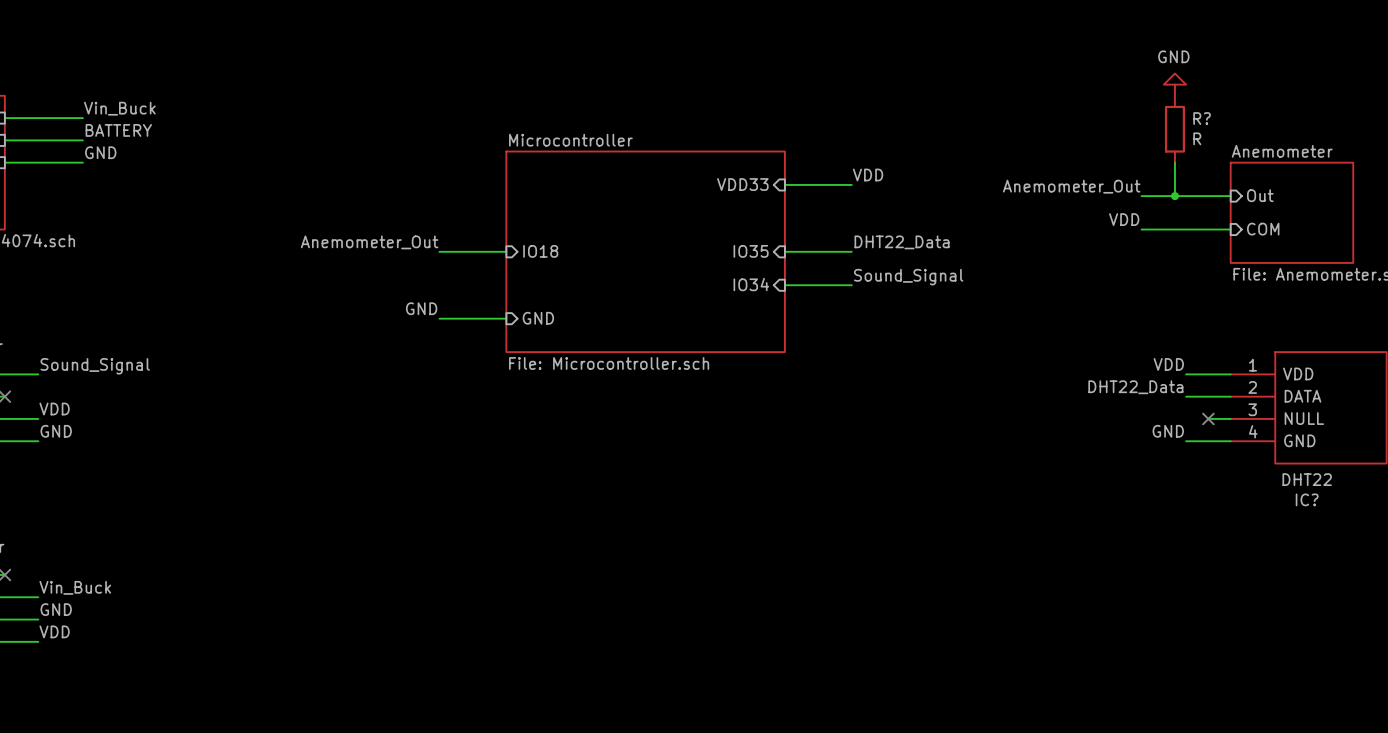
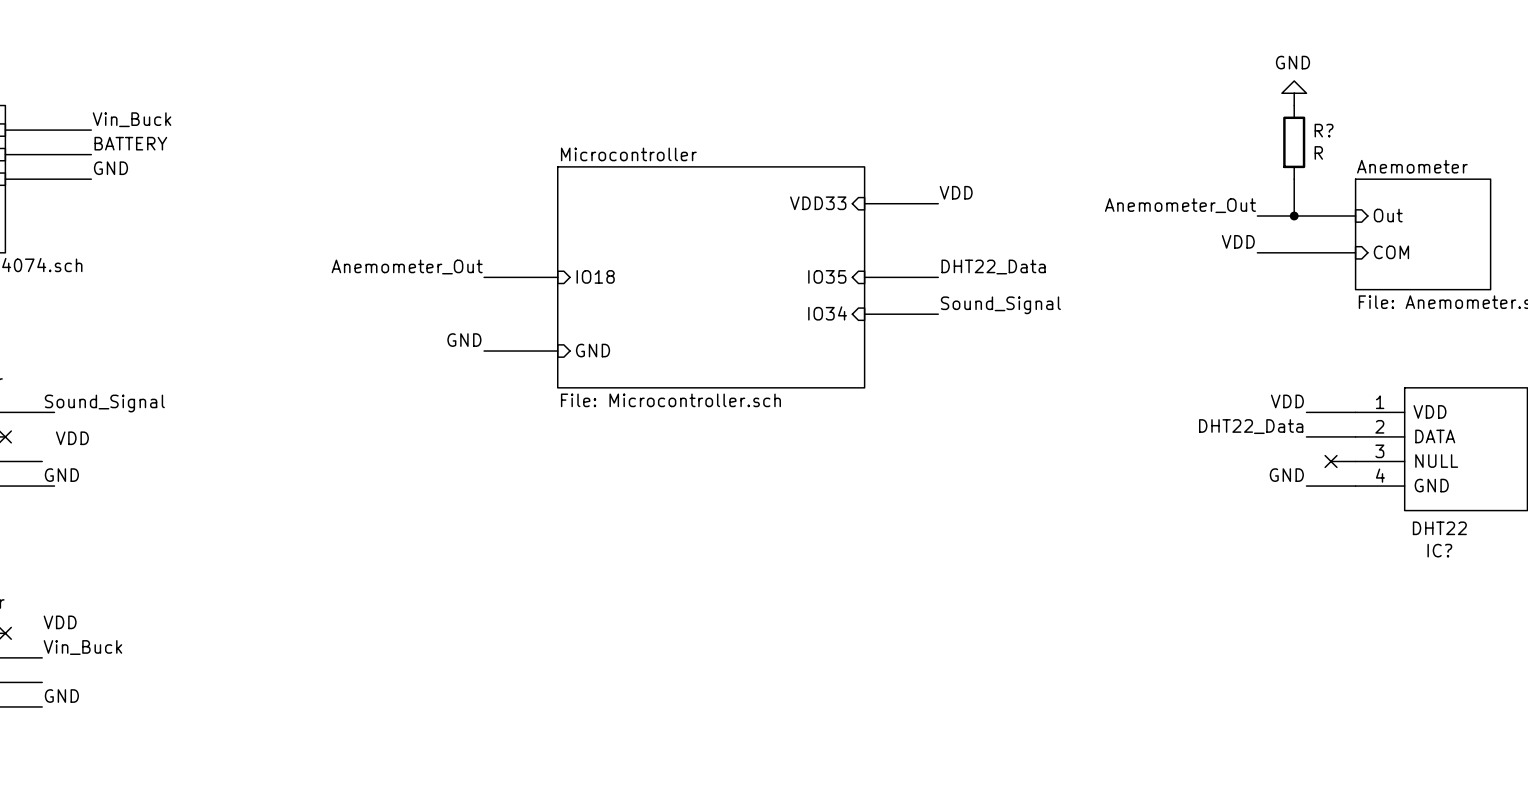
wire: none -> (42, 412) (54, 412)
label position: VDD (54, 409) -> VDD (72, 438)
wire: none -> (42, 486) (54, 486)
label: none -> VDD (60, 622)
label: GND (56, 609) -> none
label: VDD (54, 631) -> GND (61, 696)

